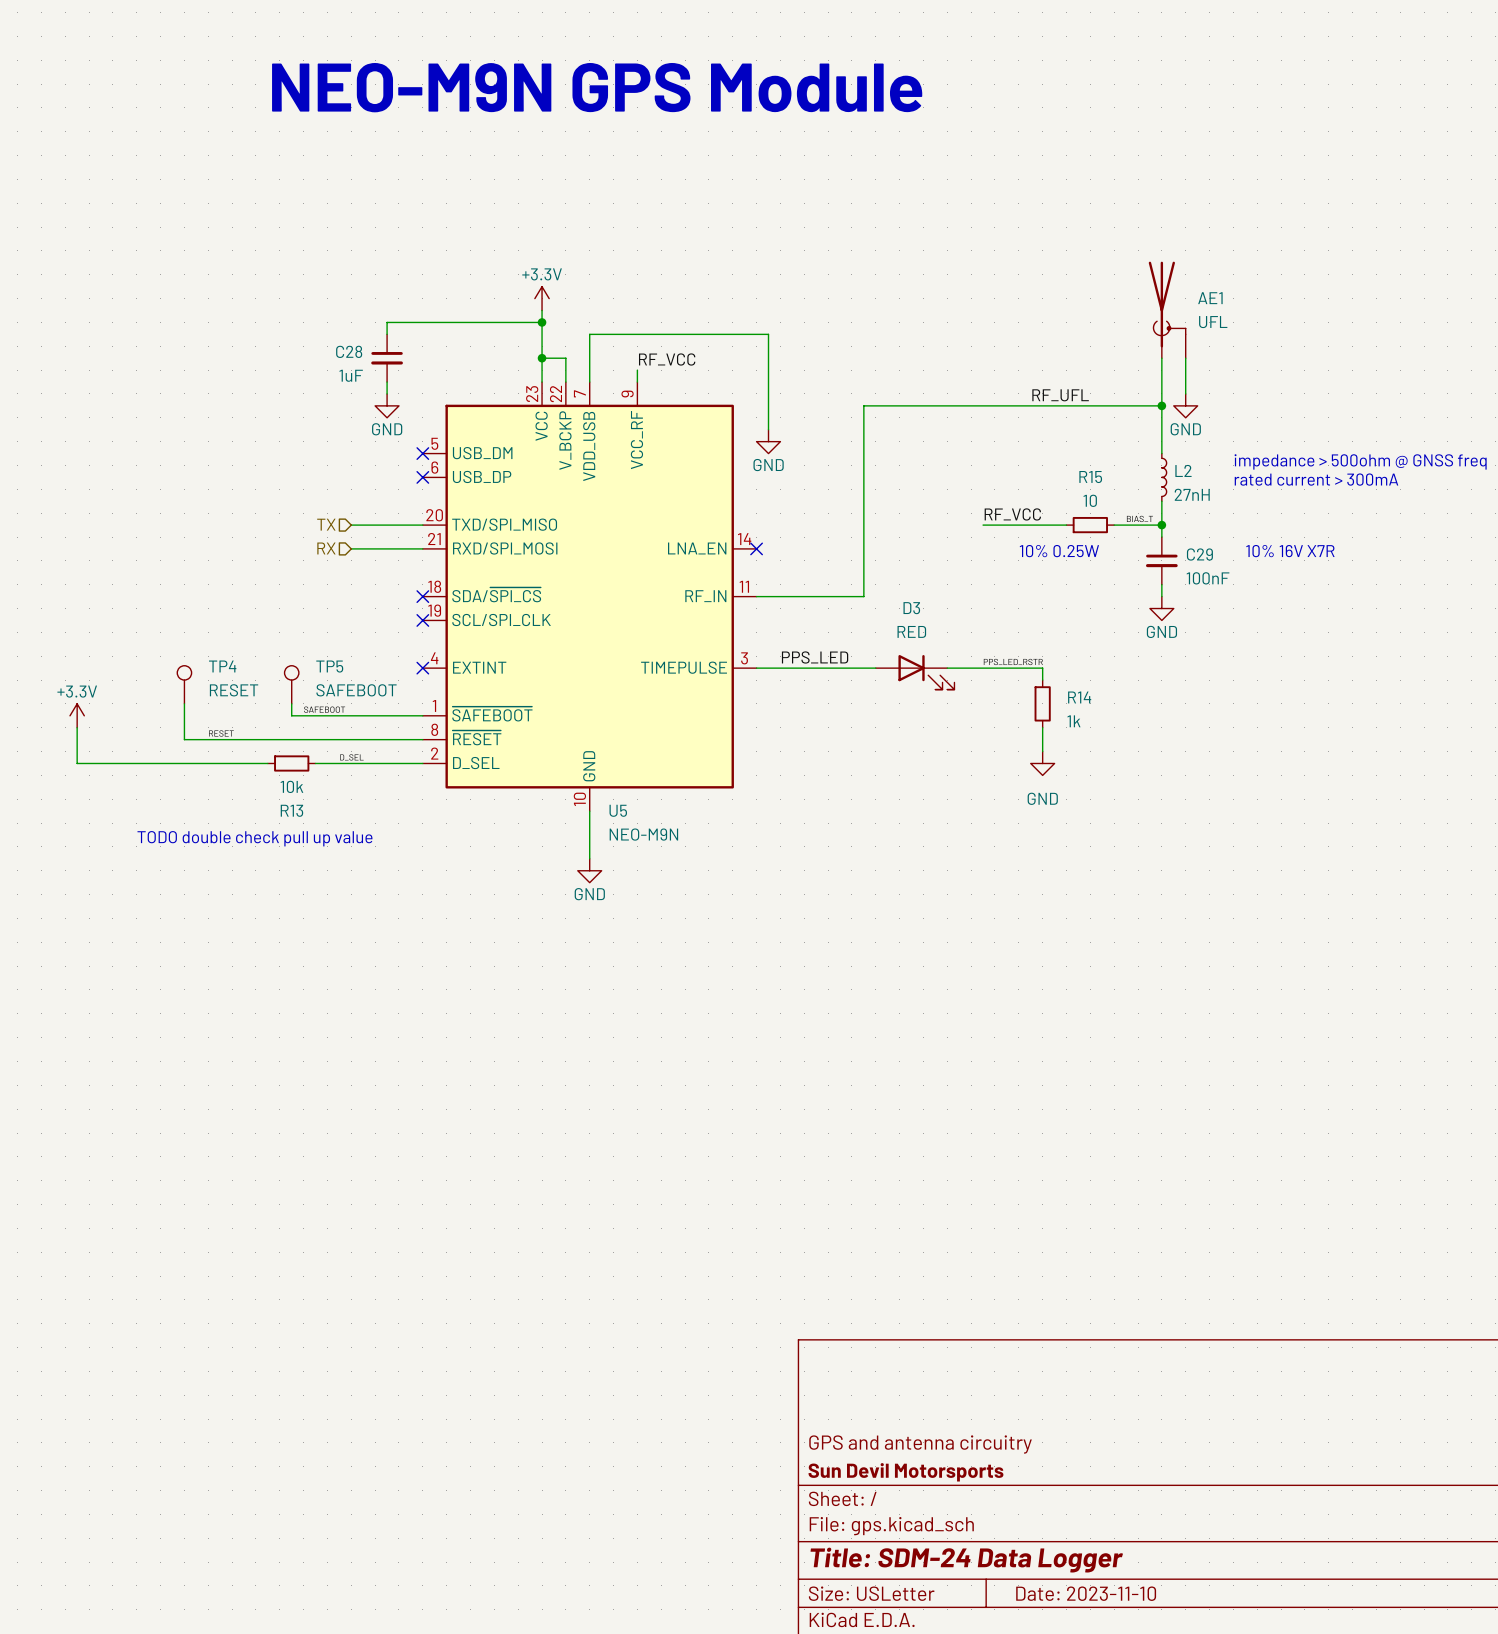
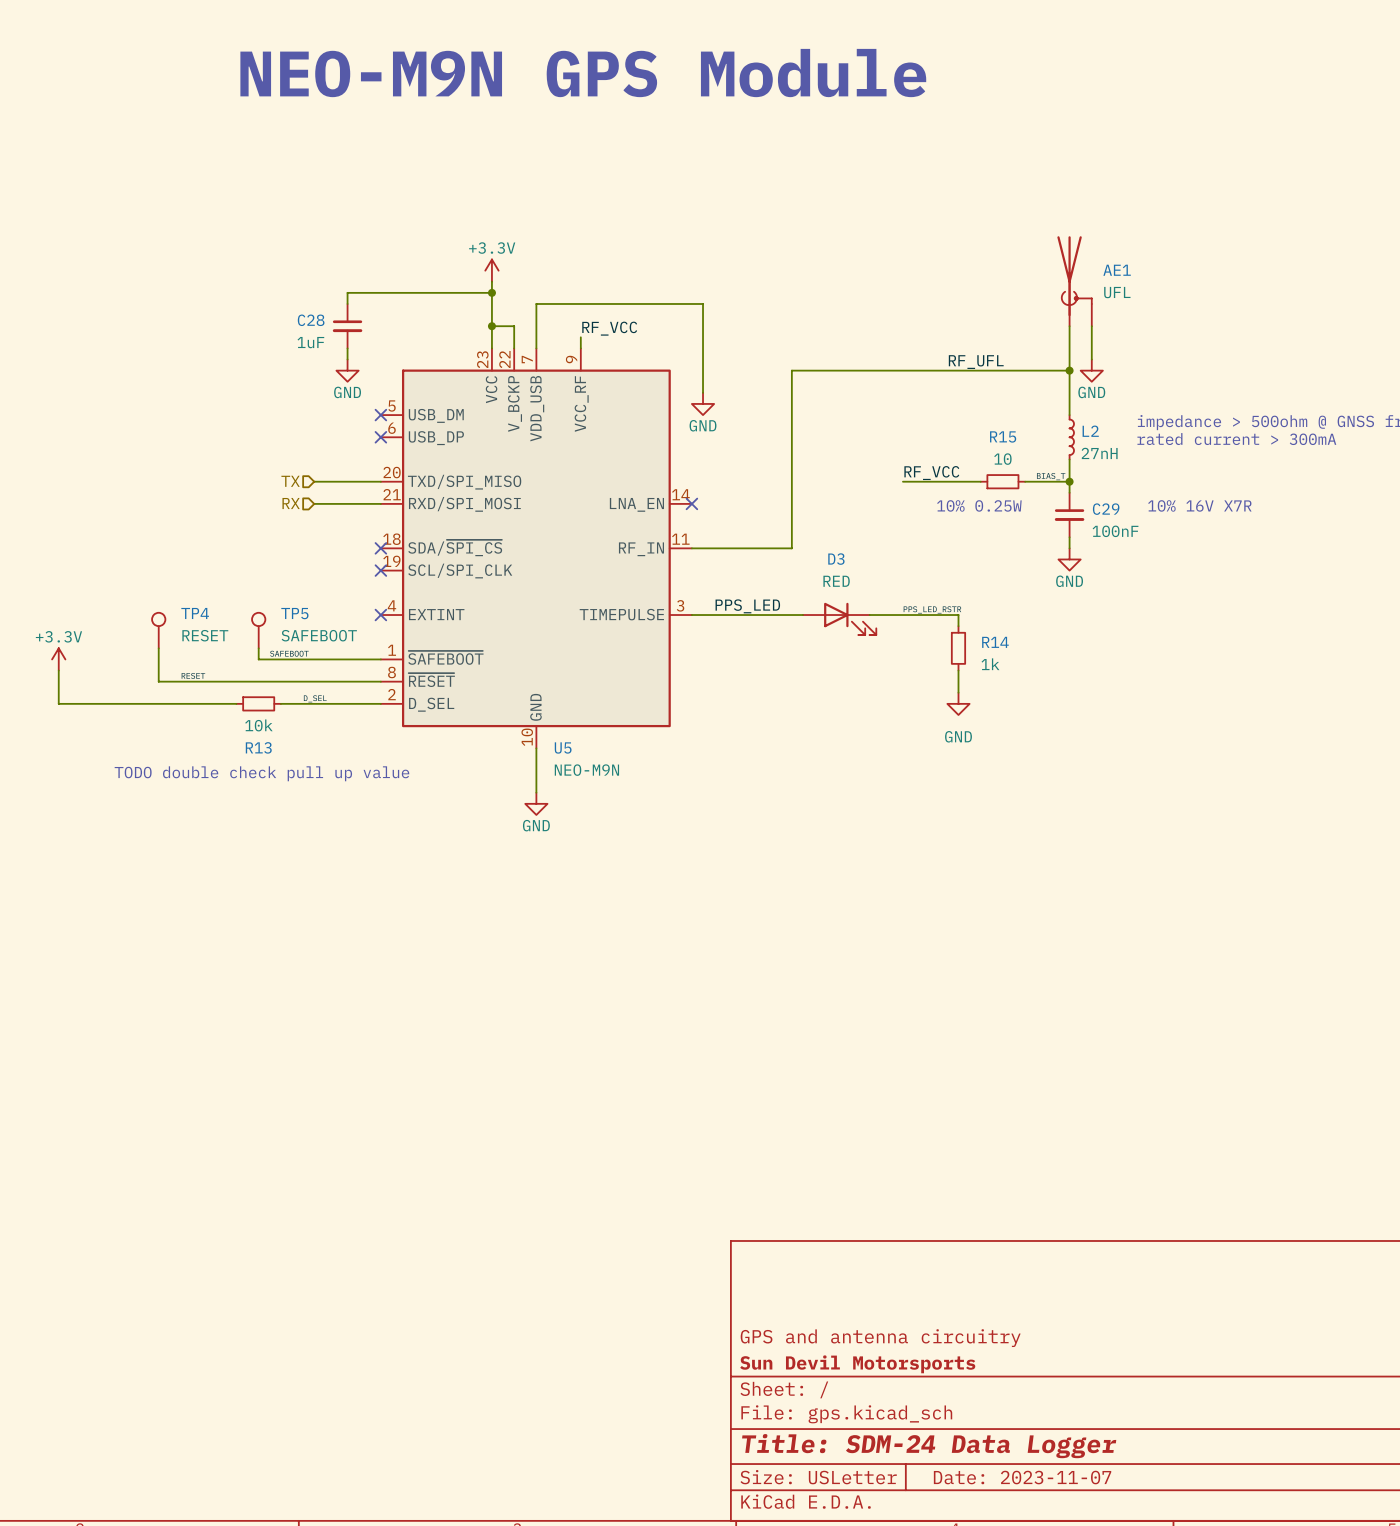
title block: Date: 2023-11-10 (1086, 1593) -> Date: 2023-11-07 (1022, 1477)

